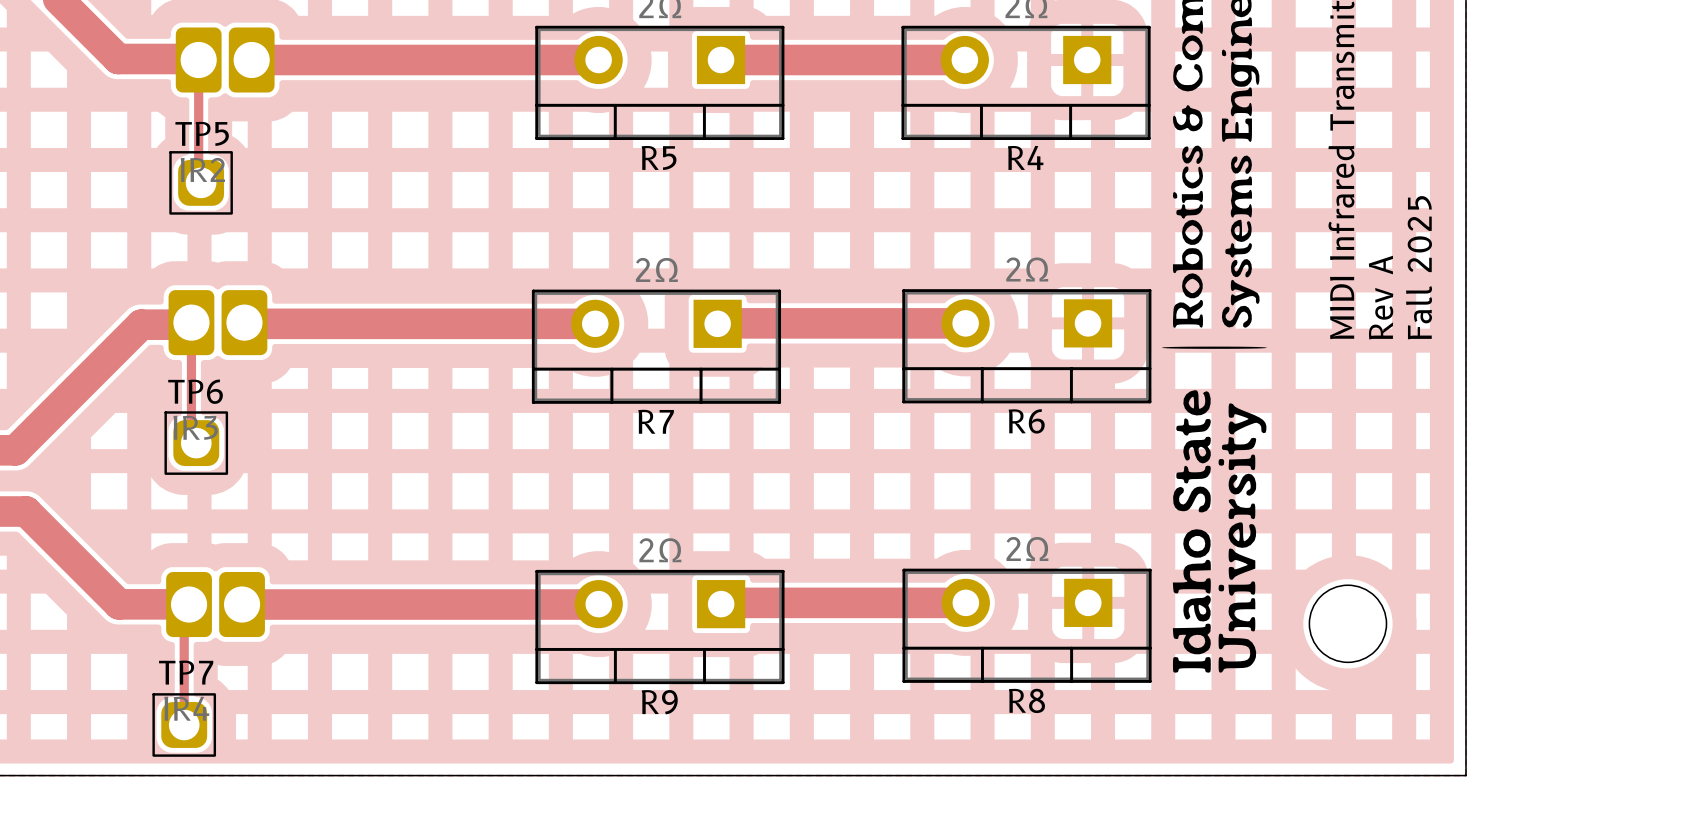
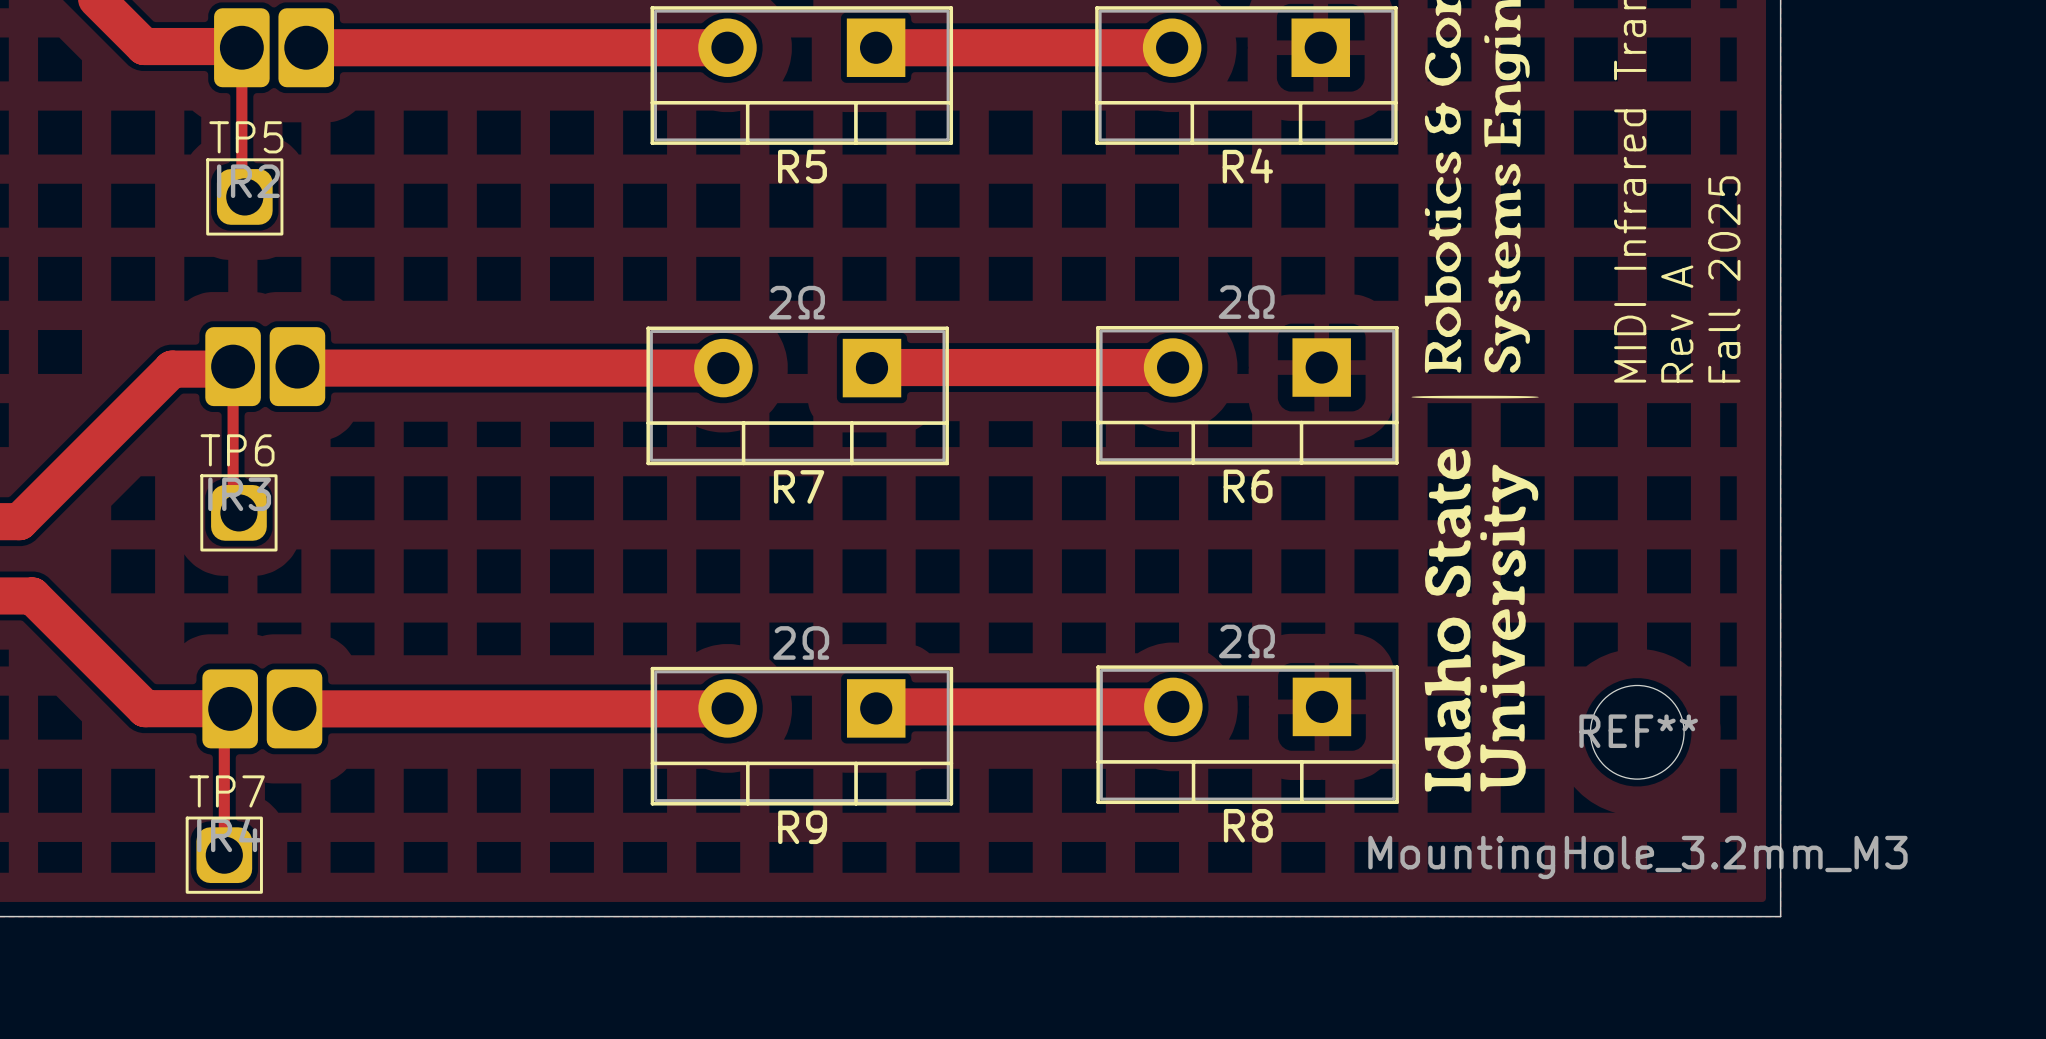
REF** name: none -> REF** (1638, 731)
REF** value: none -> MountingHole_3.2mm_M3 (1637, 857)

